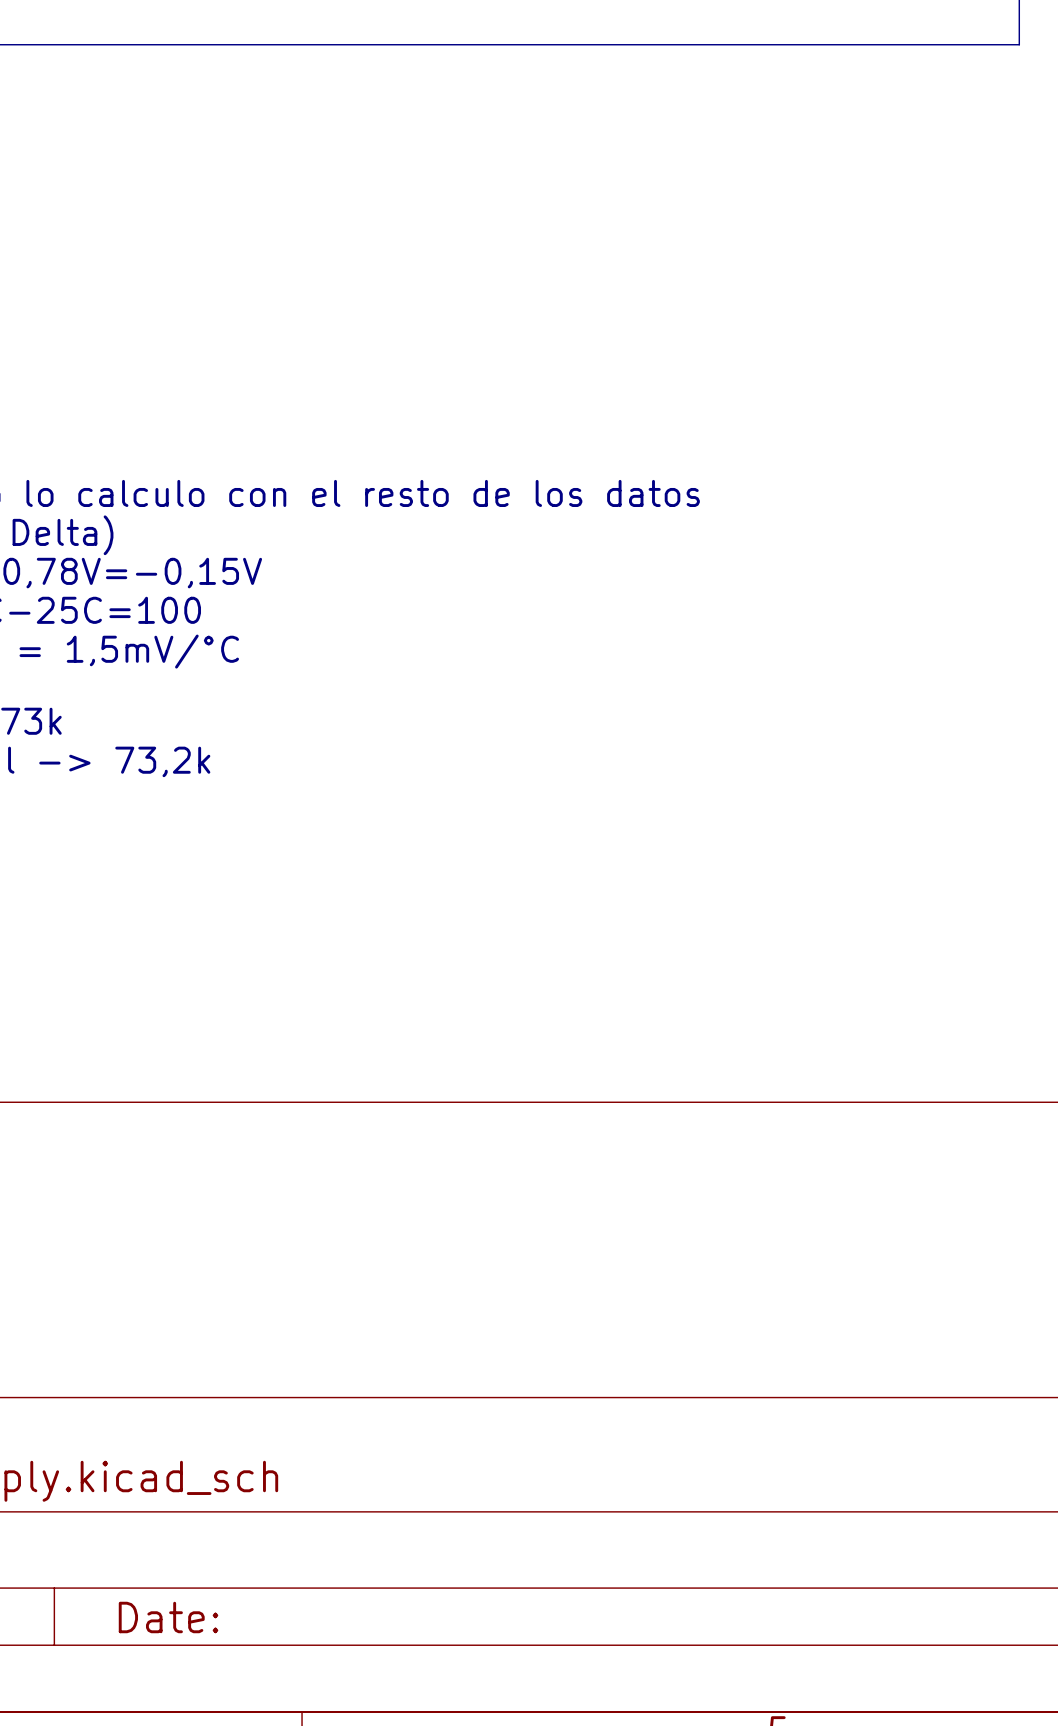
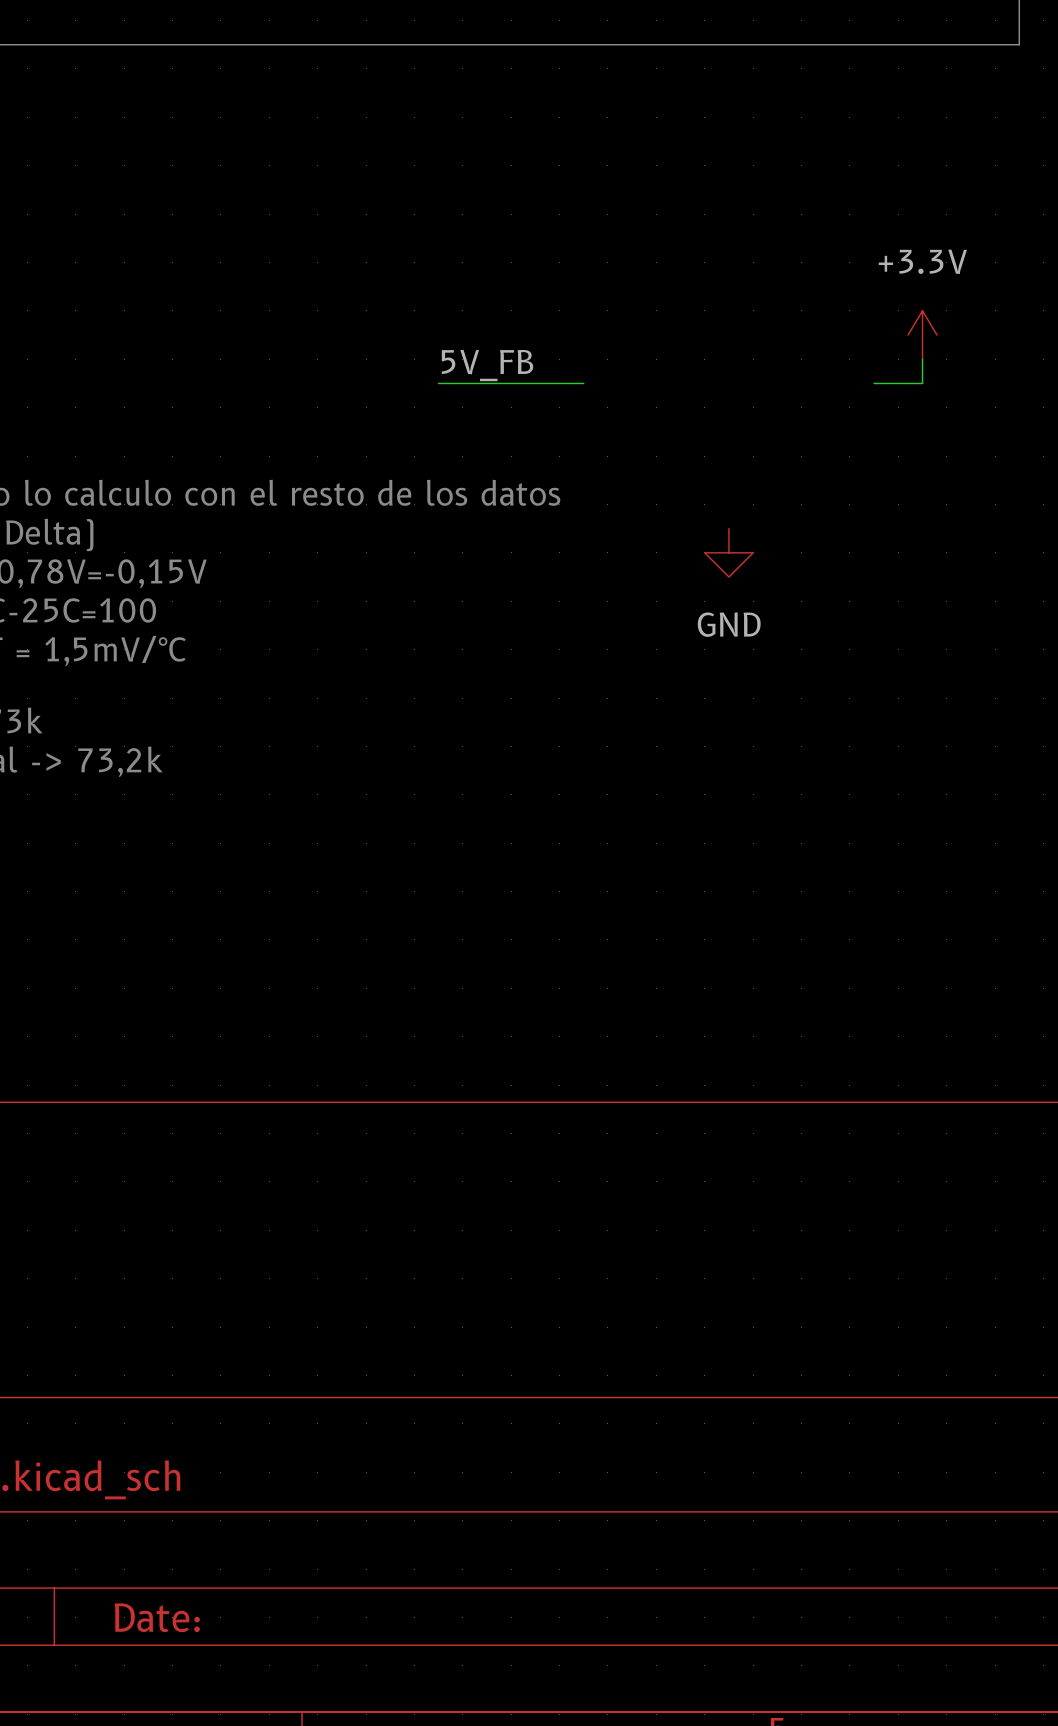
power symbol: none -> +3.3V (922, 335)
wire: none -> (922, 359) (922, 383) (874, 383)
label: none -> 5V_FB (487, 365)
wire: none -> (438, 383) (583, 383)
power symbol: none -> GND (728, 552)

